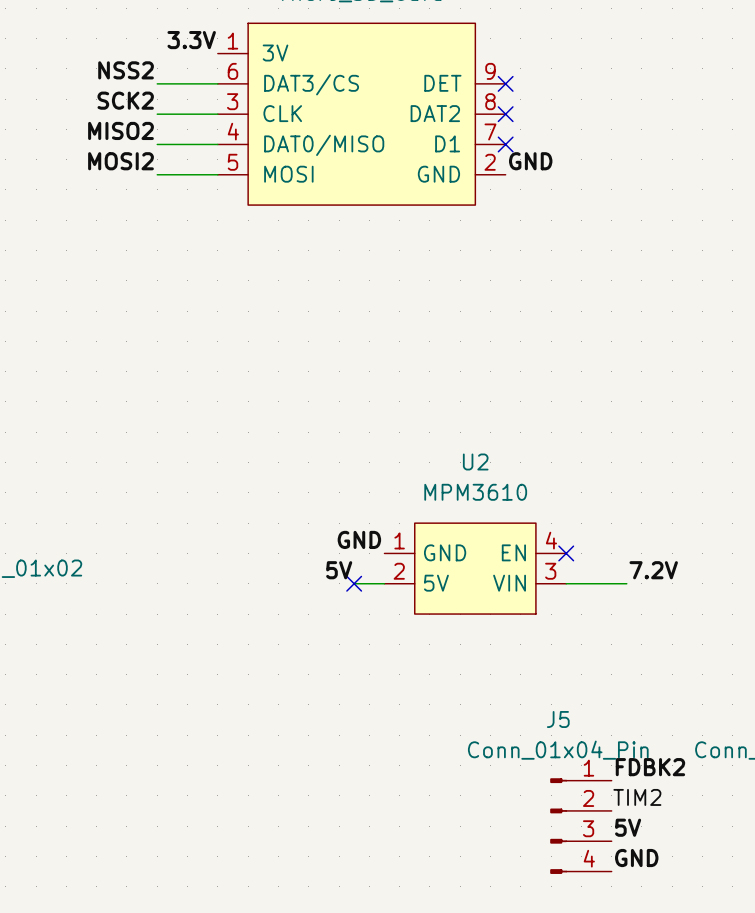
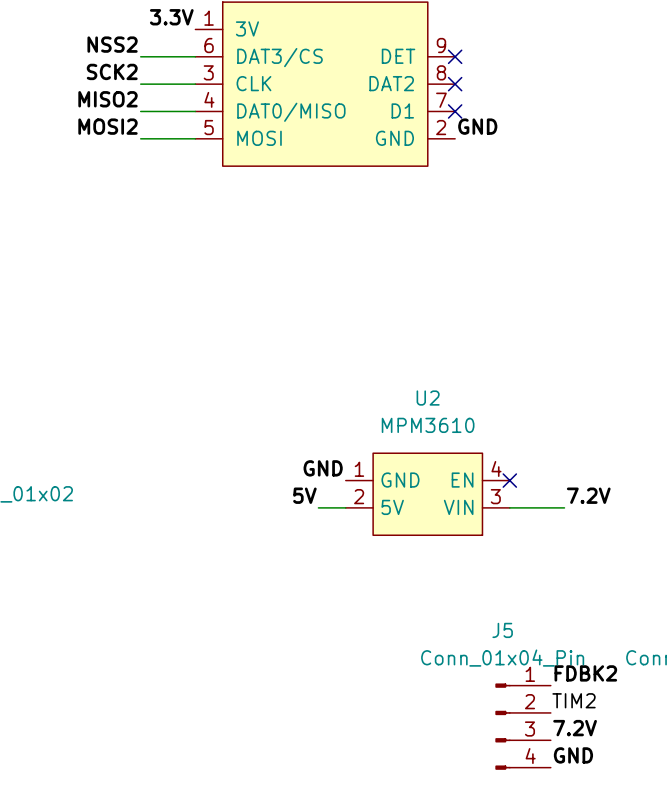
no-connect mark: (354, 583) -> none
label: 5V (628, 827) -> 7.2V (575, 728)

